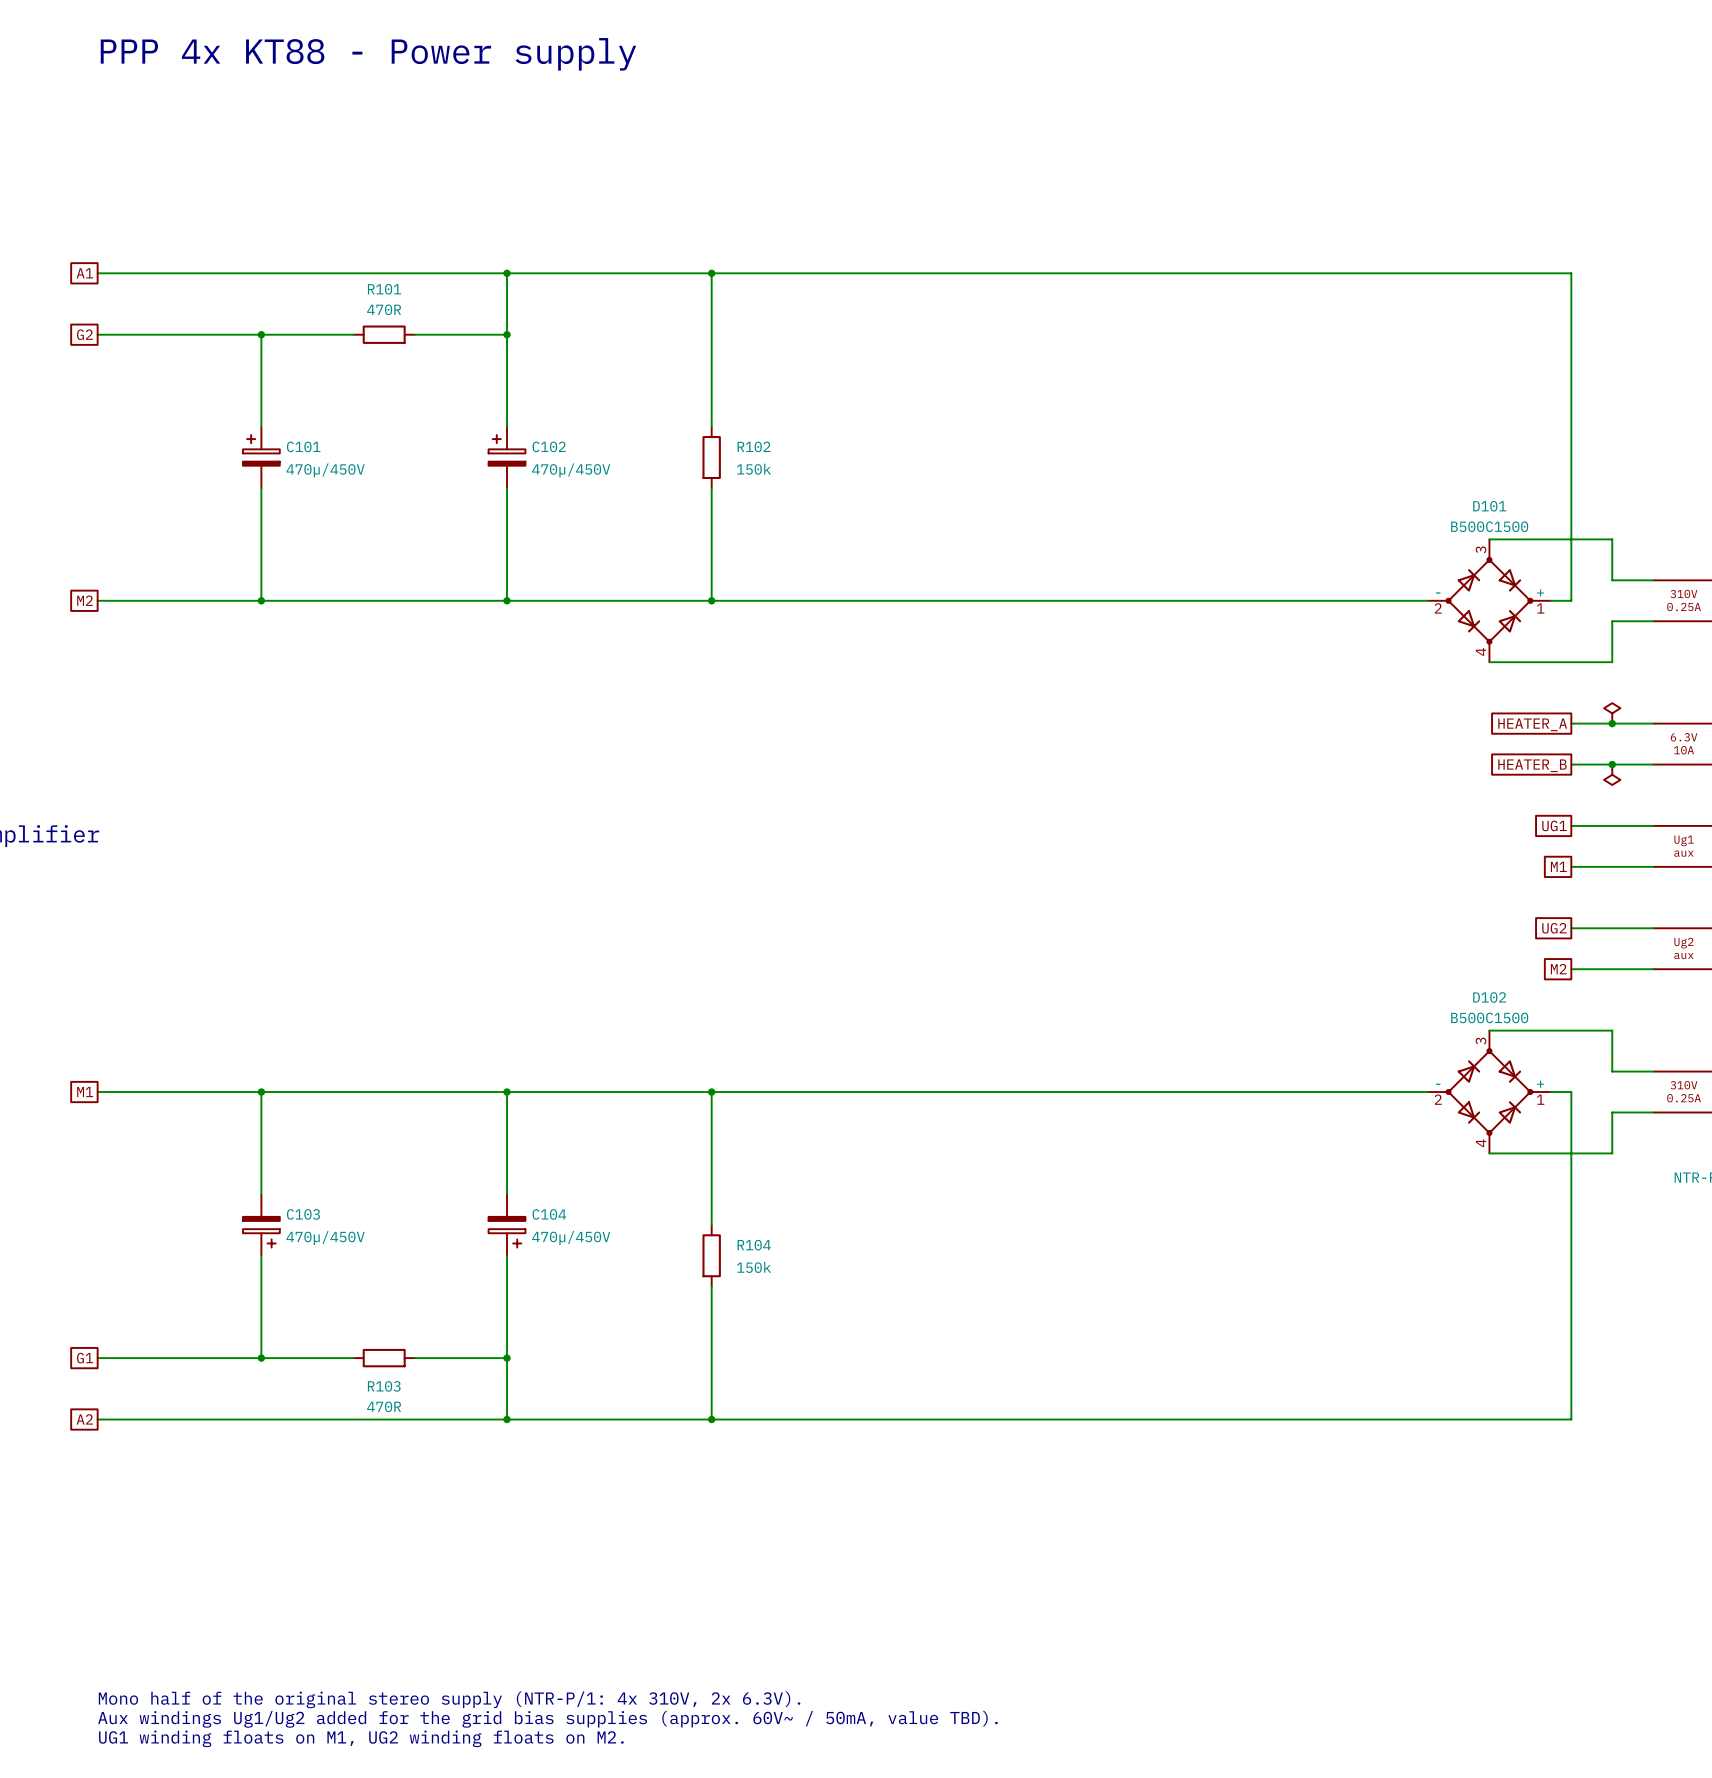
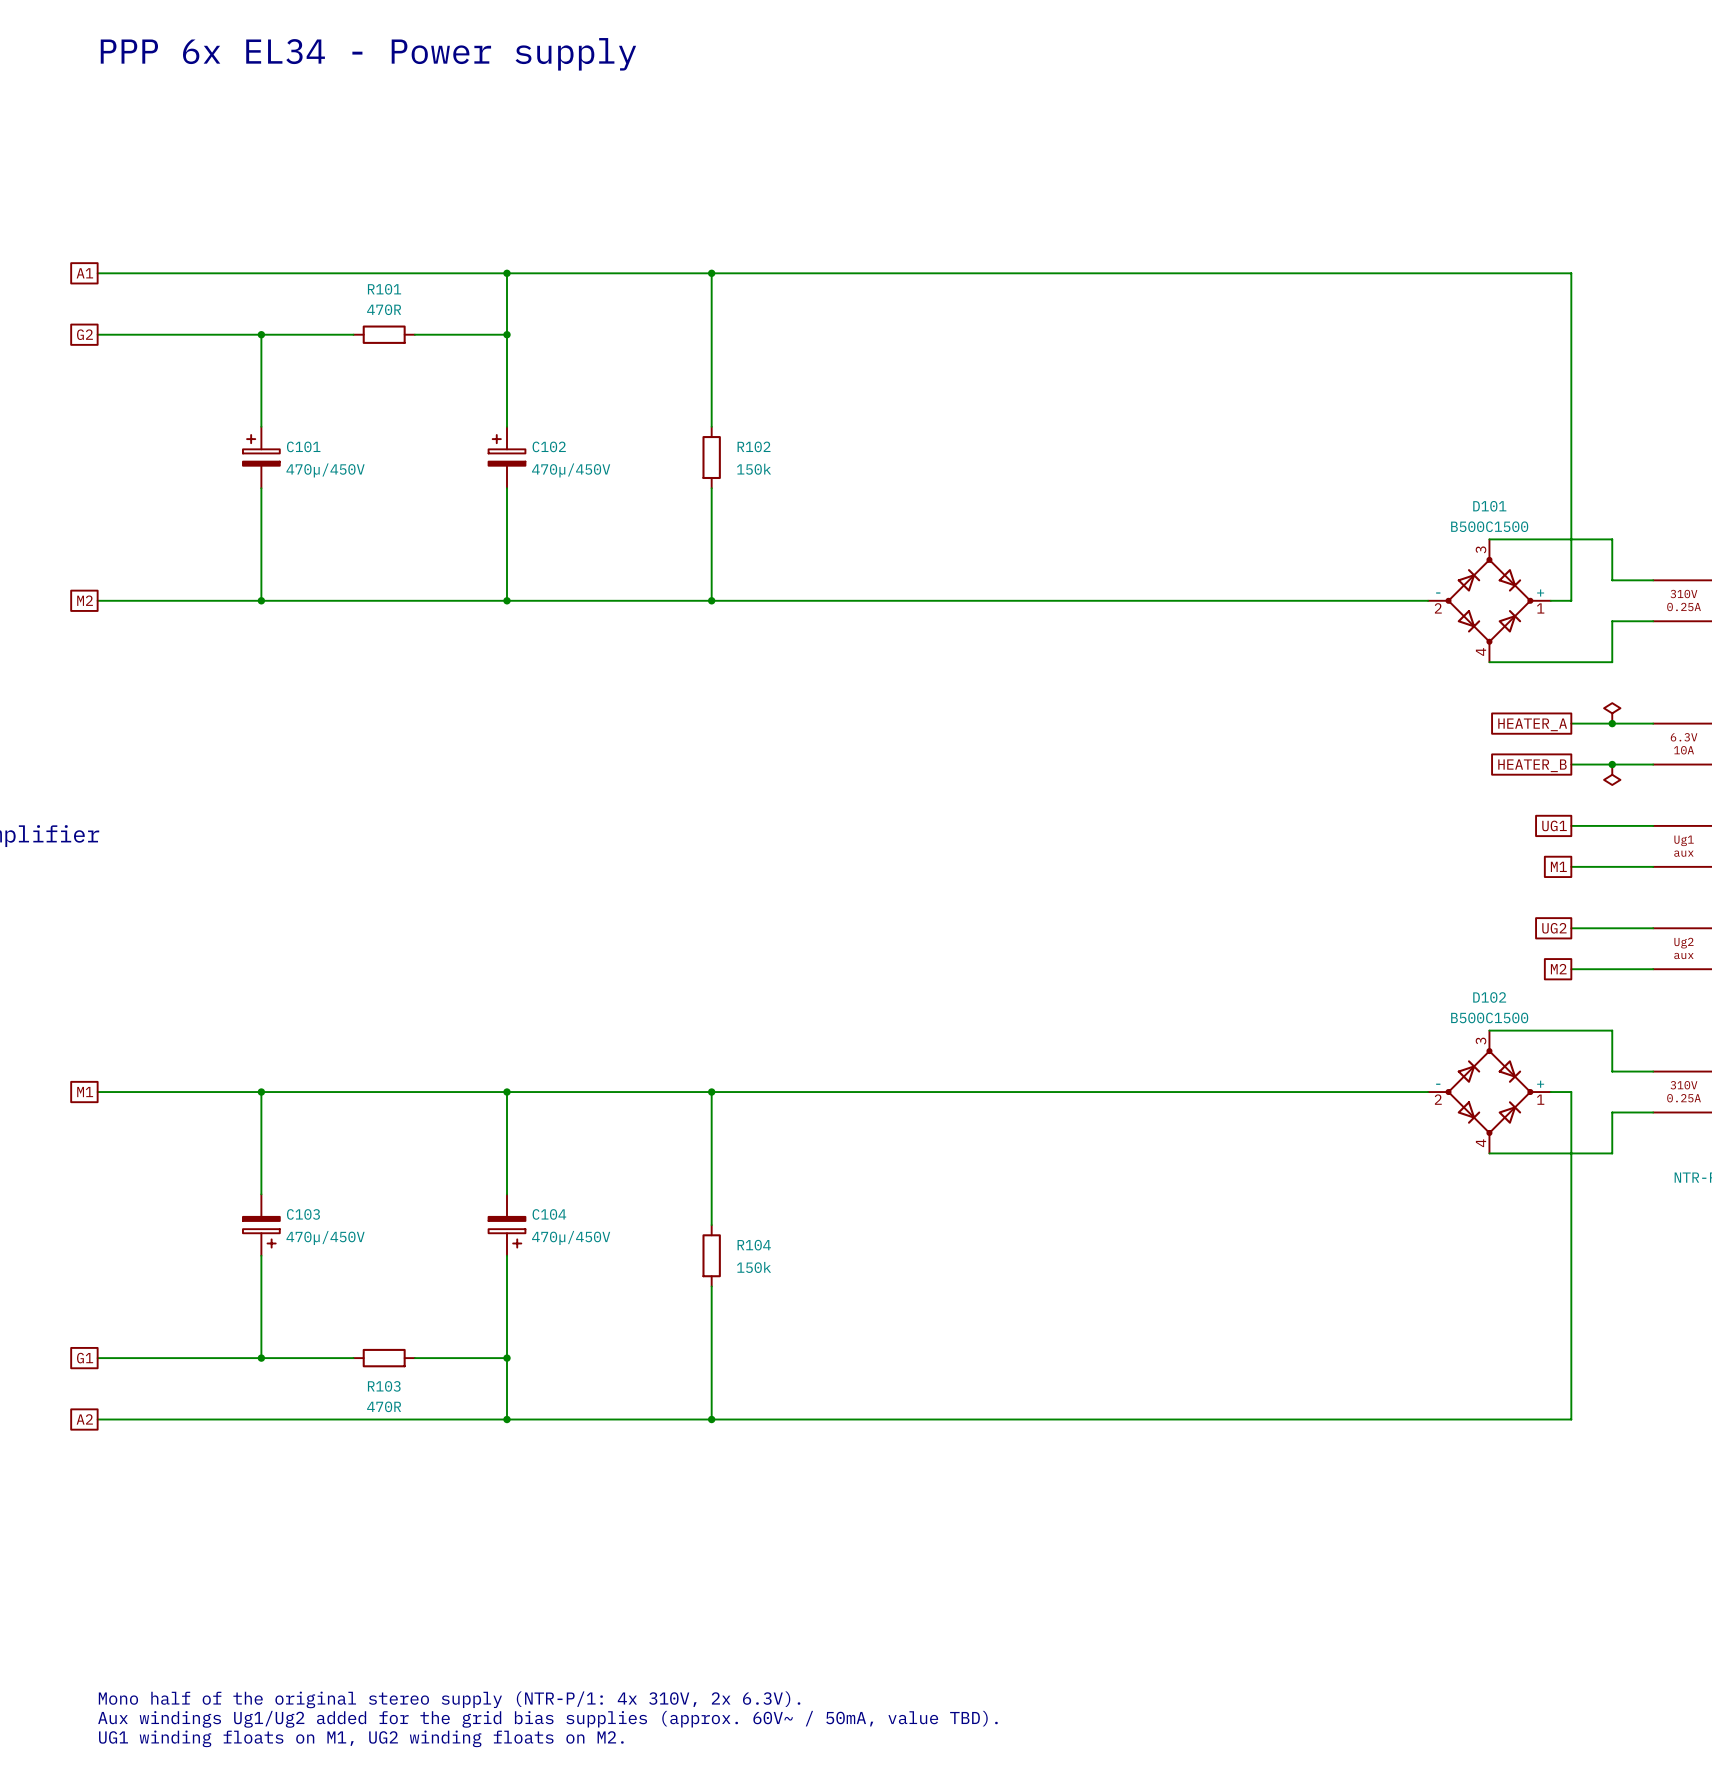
text: PPP 4x KT88 - Power supply (368, 54) -> PPP 6x EL34 - Power supply (368, 54)

